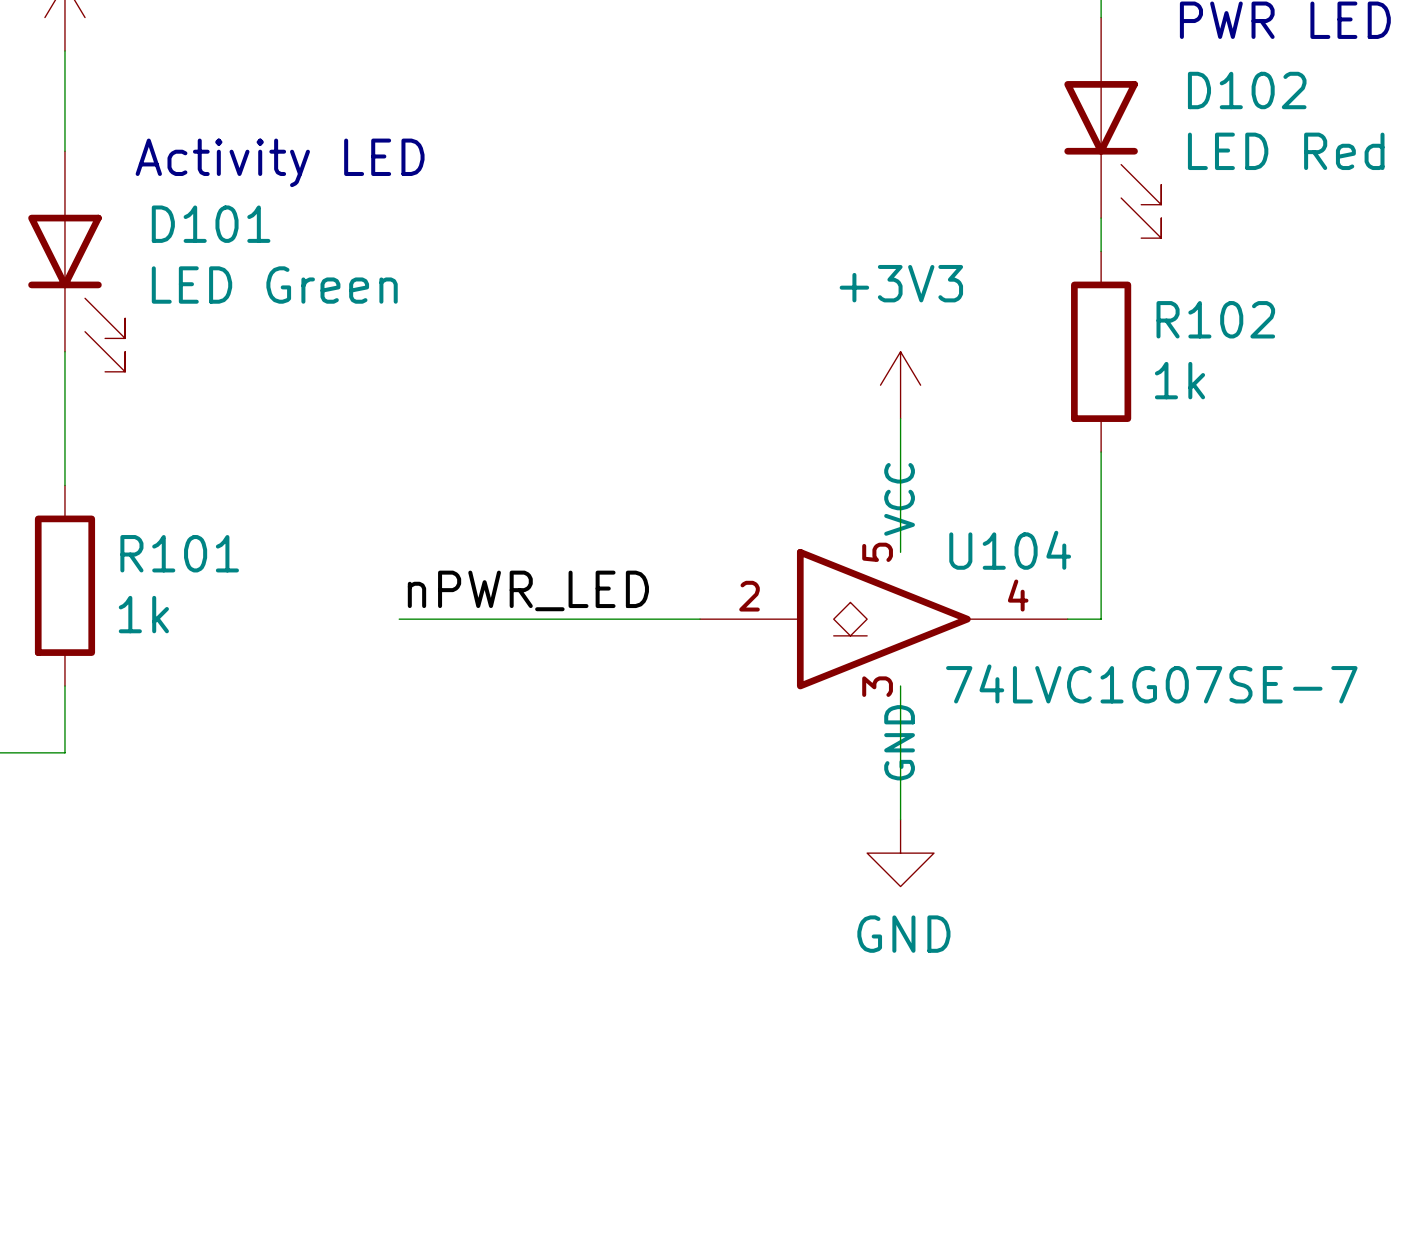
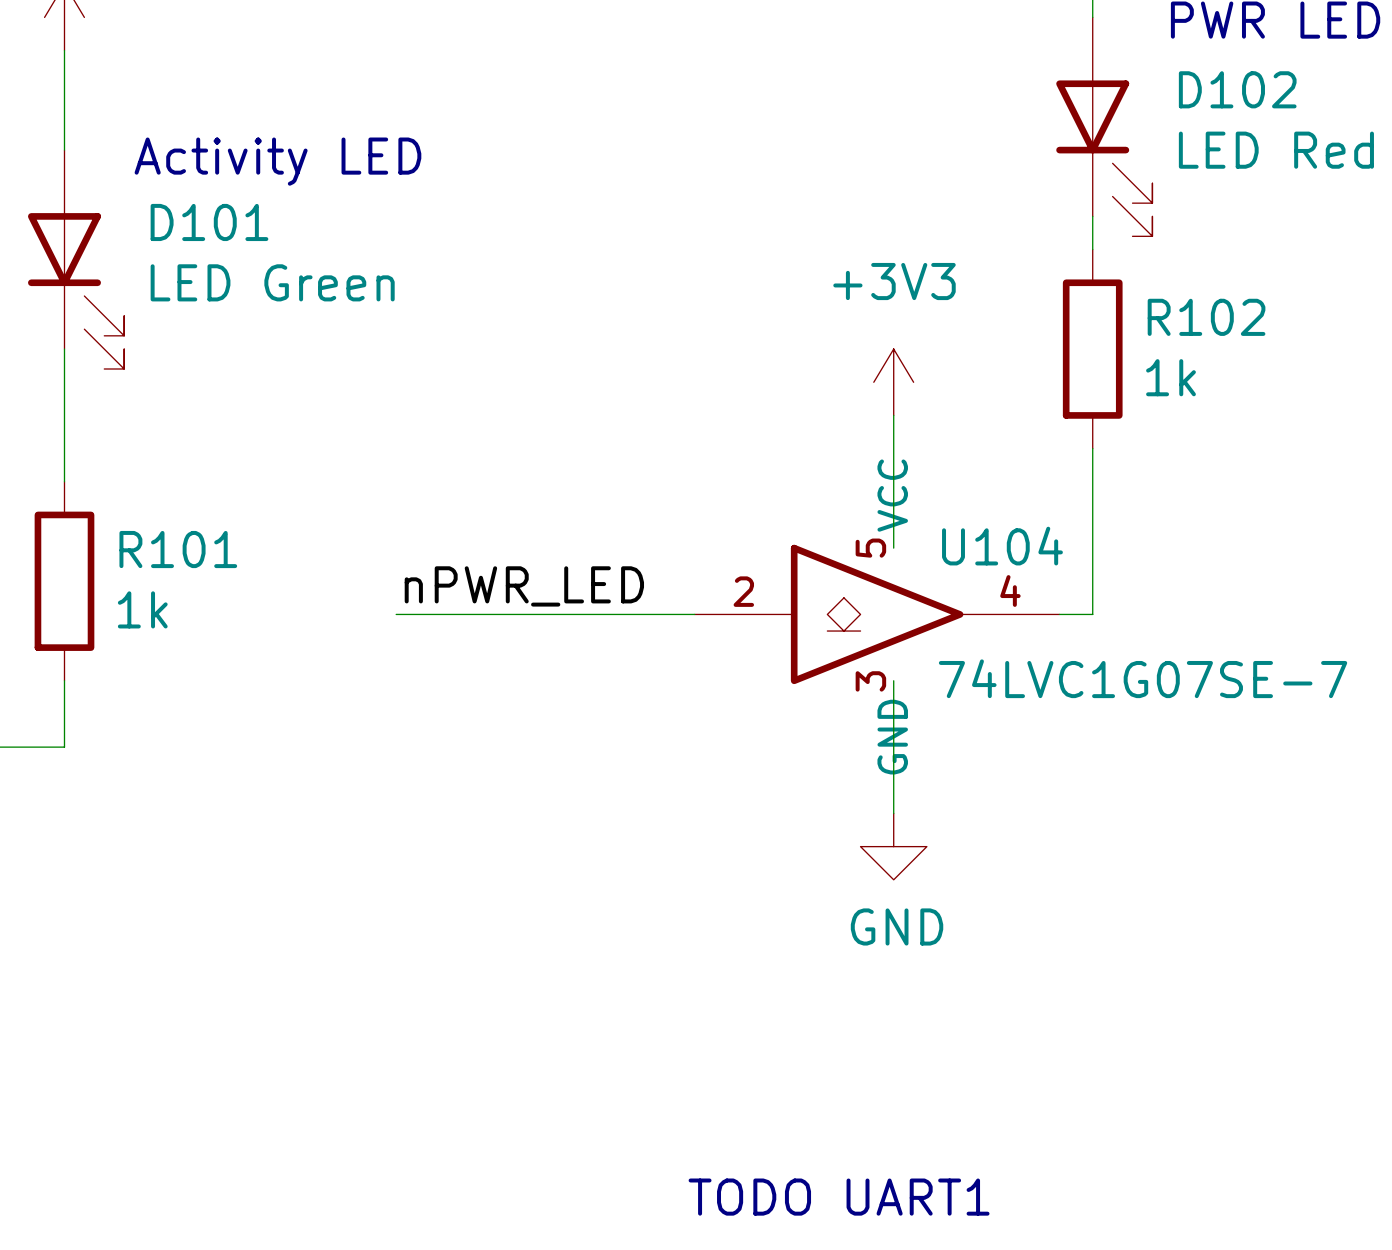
text: none -> TODO UART1 (839, 1197)

